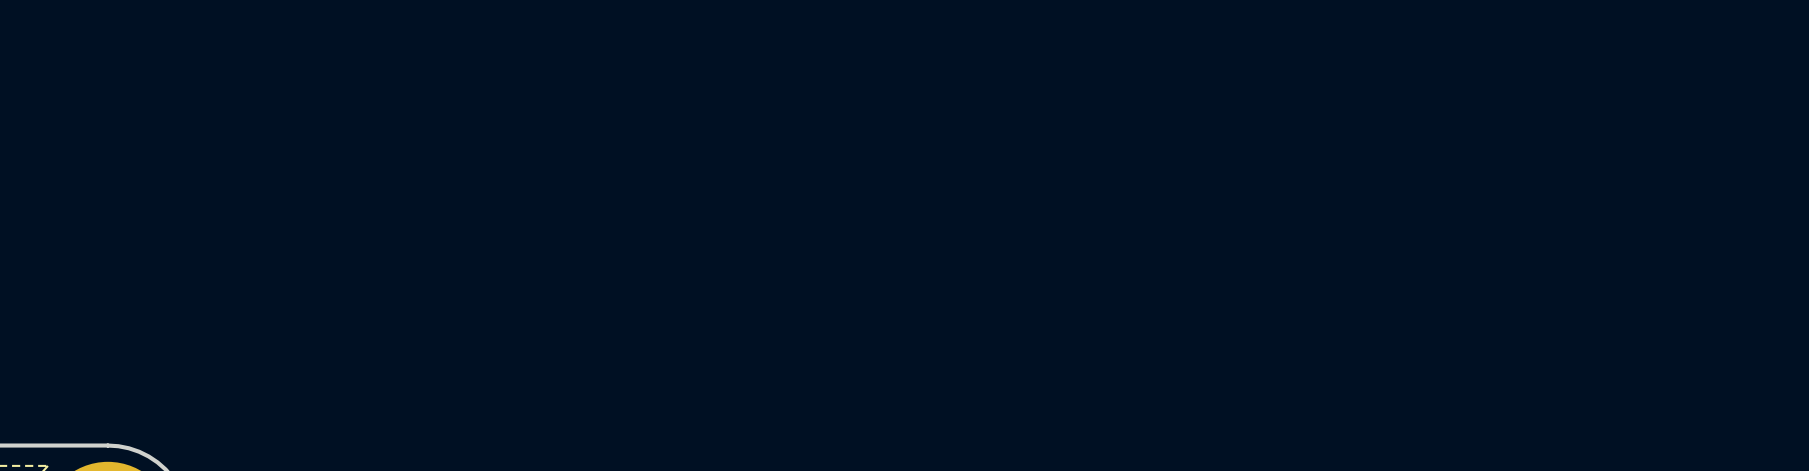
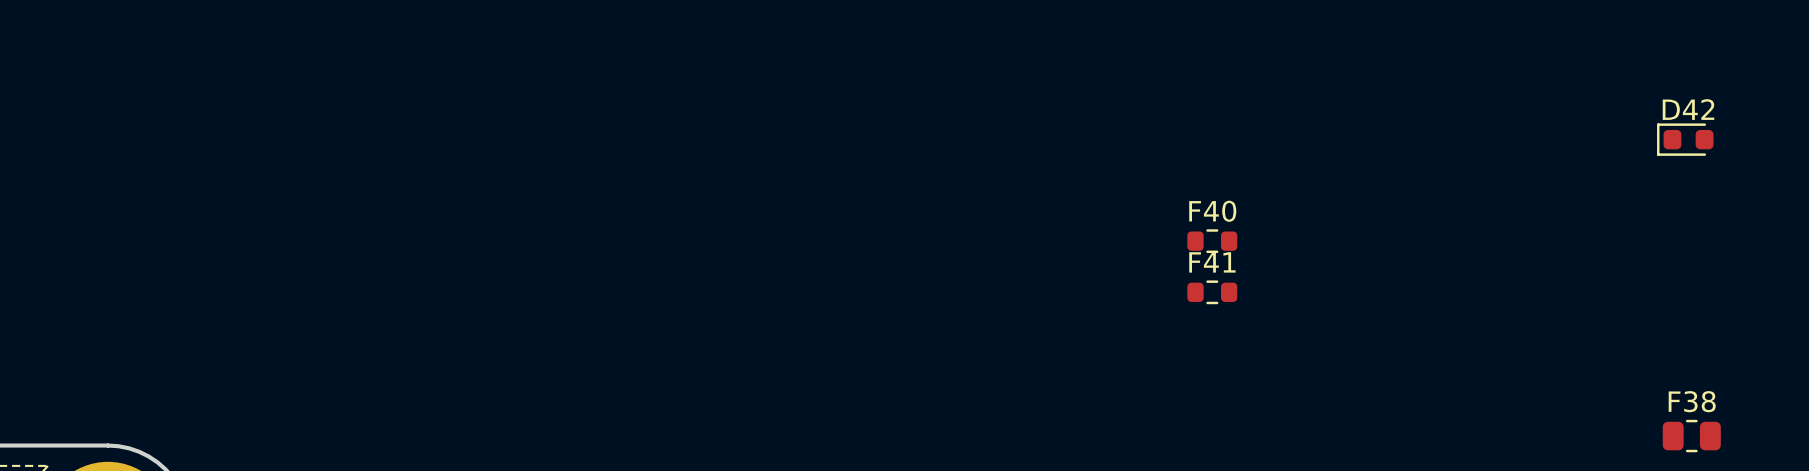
D42: none -> (1685, 139)
F40: none -> (1212, 241)
F41: none -> (1212, 292)
F38: none -> (1691, 436)

